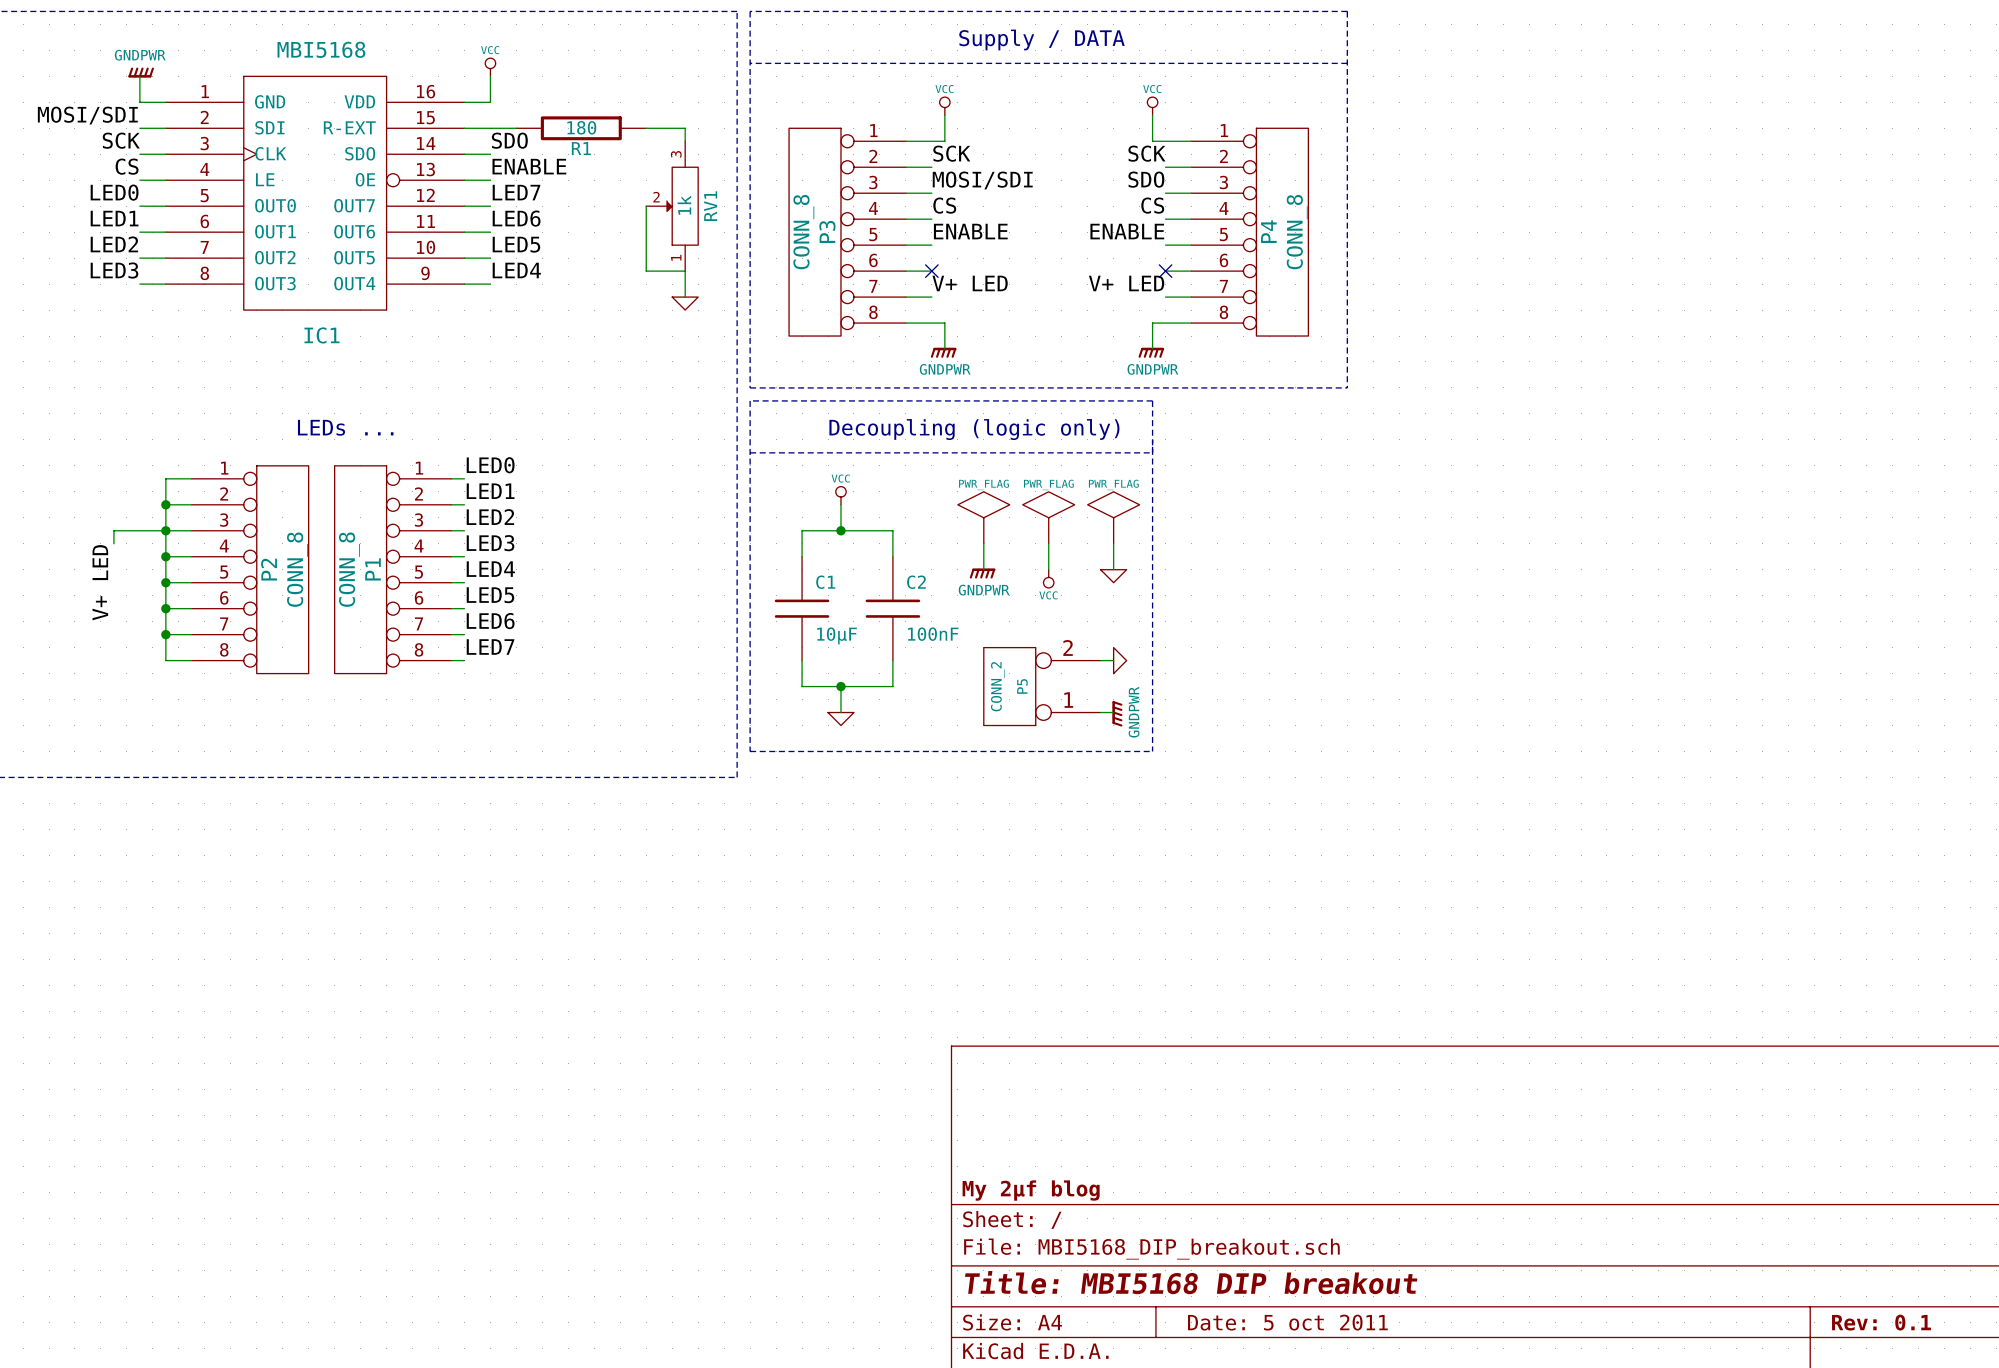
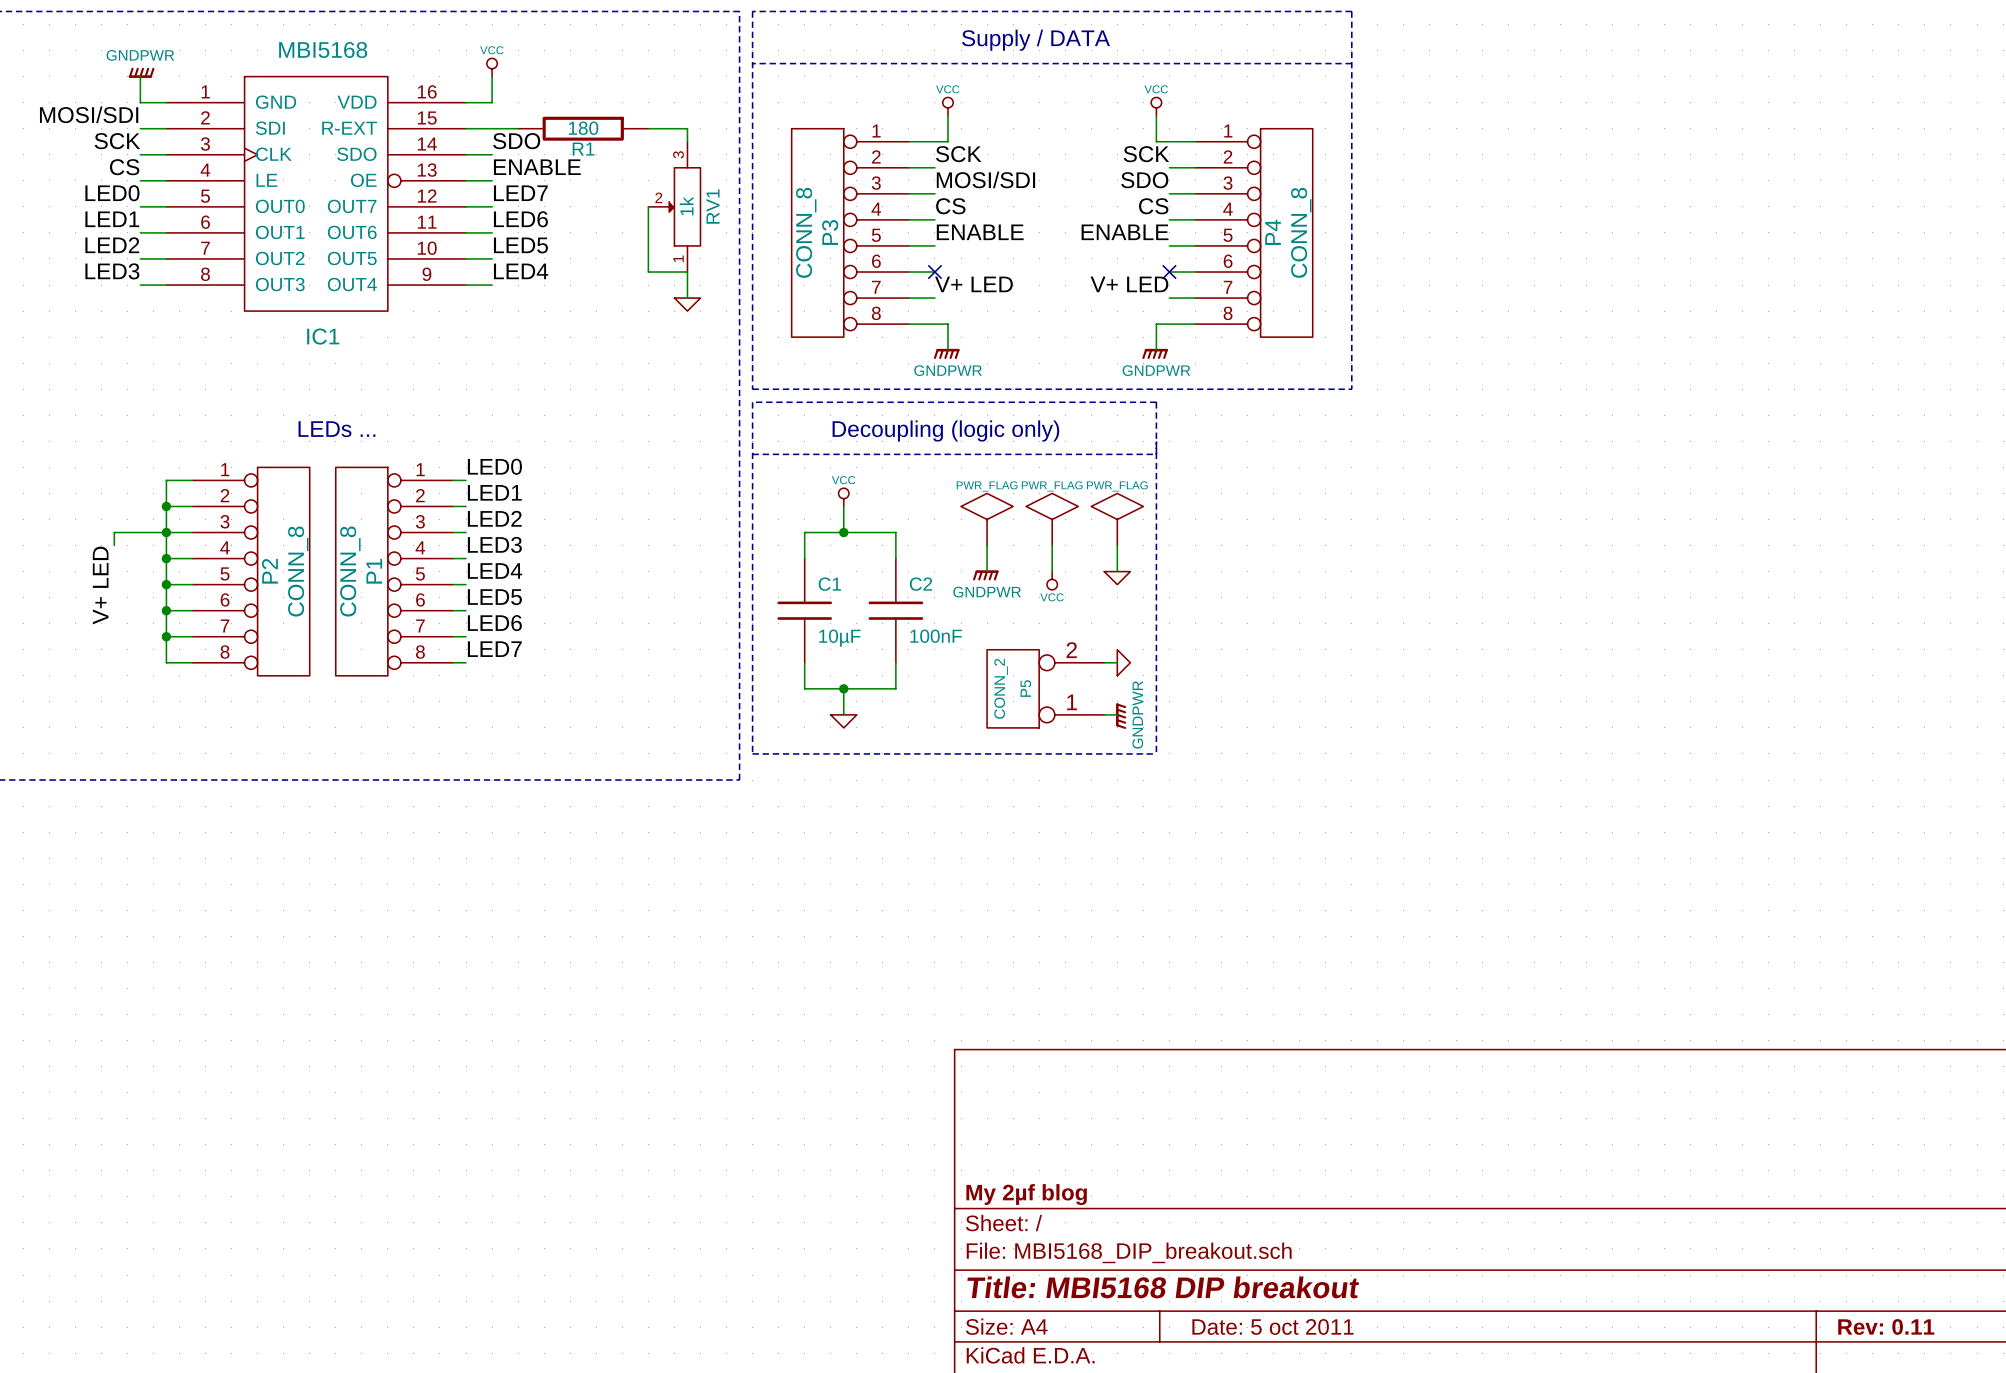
title block: Rev: 0.1 (1881, 1322) -> Rev: 0.11 (1886, 1326)

